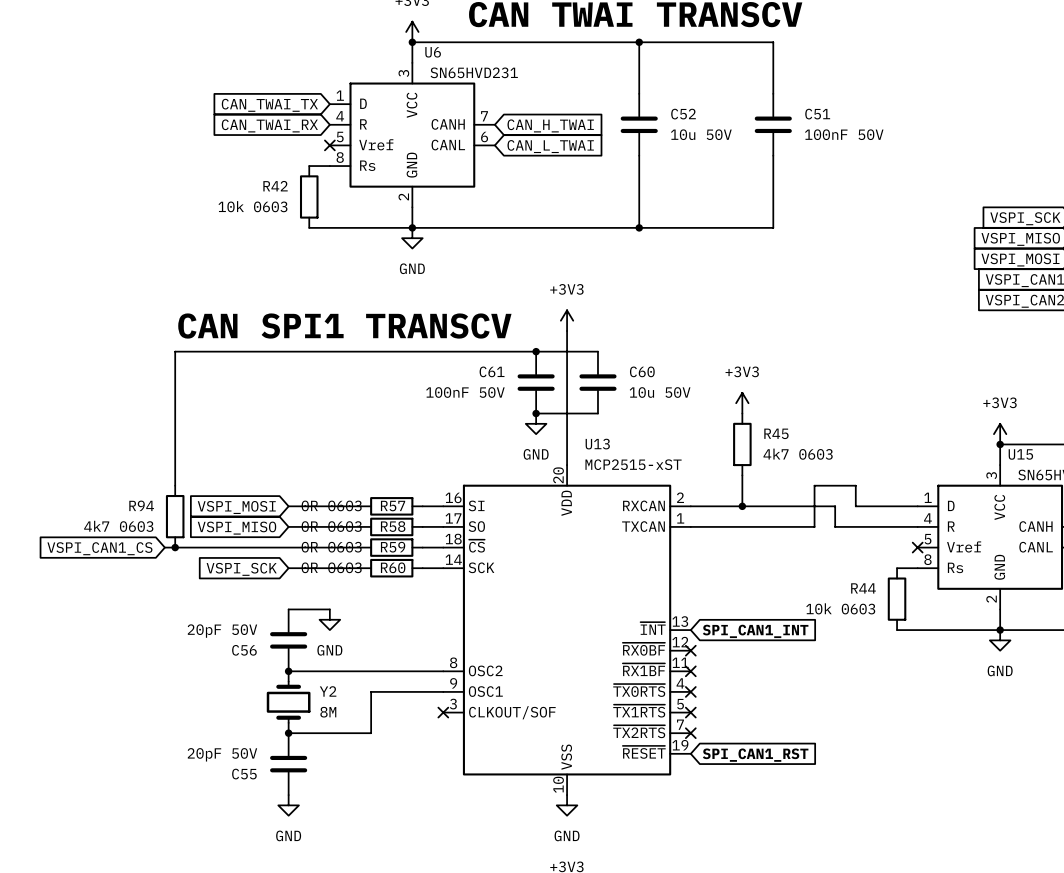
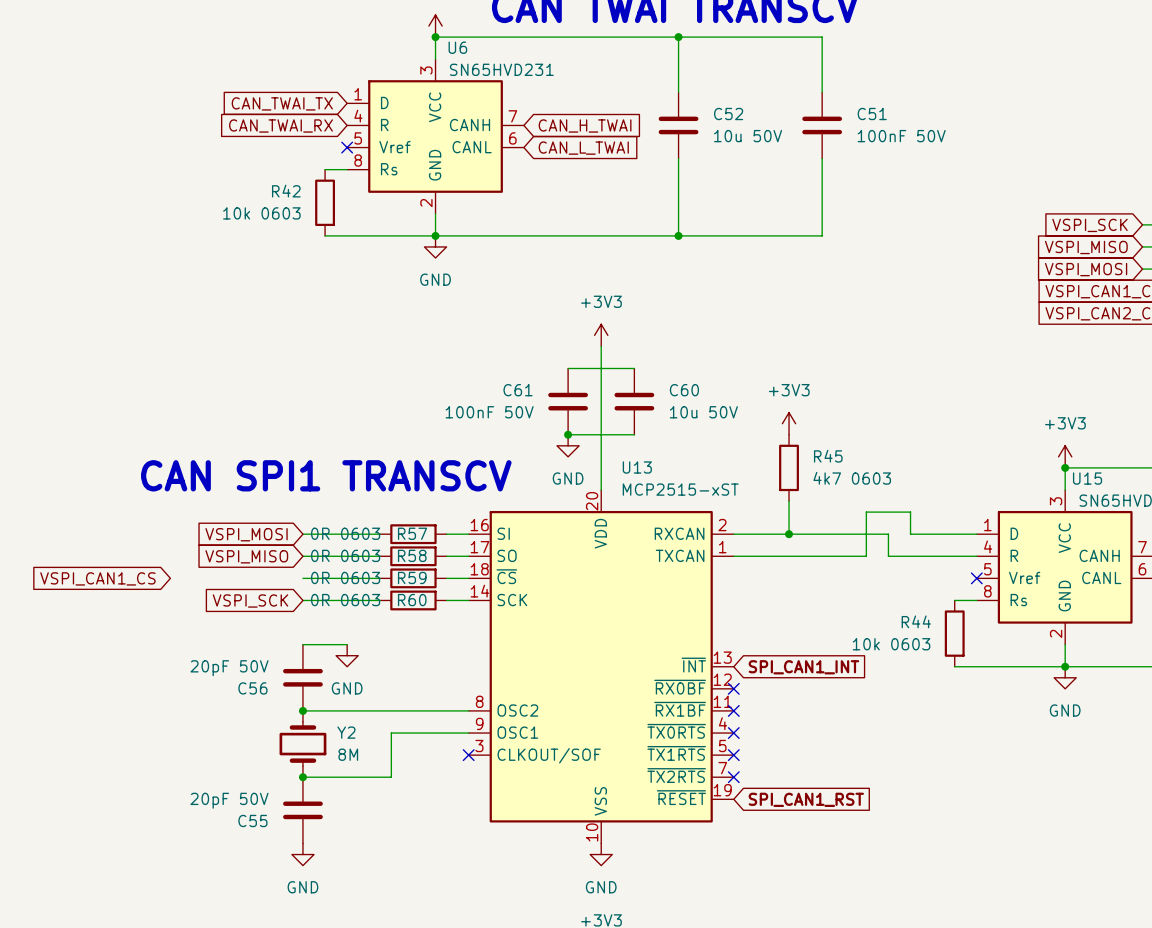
text position: CAN SPI1 TRANSCV (344, 326) -> CAN SPI1 TRANSCV (326, 475)
wire: (536, 351) (175, 351) (175, 485) -> none
junction: (536, 351) -> none
R94: 4k7 0603 (175, 516) -> none
wire: (164, 547) (288, 547) -> none
junction: (175, 547) -> none

